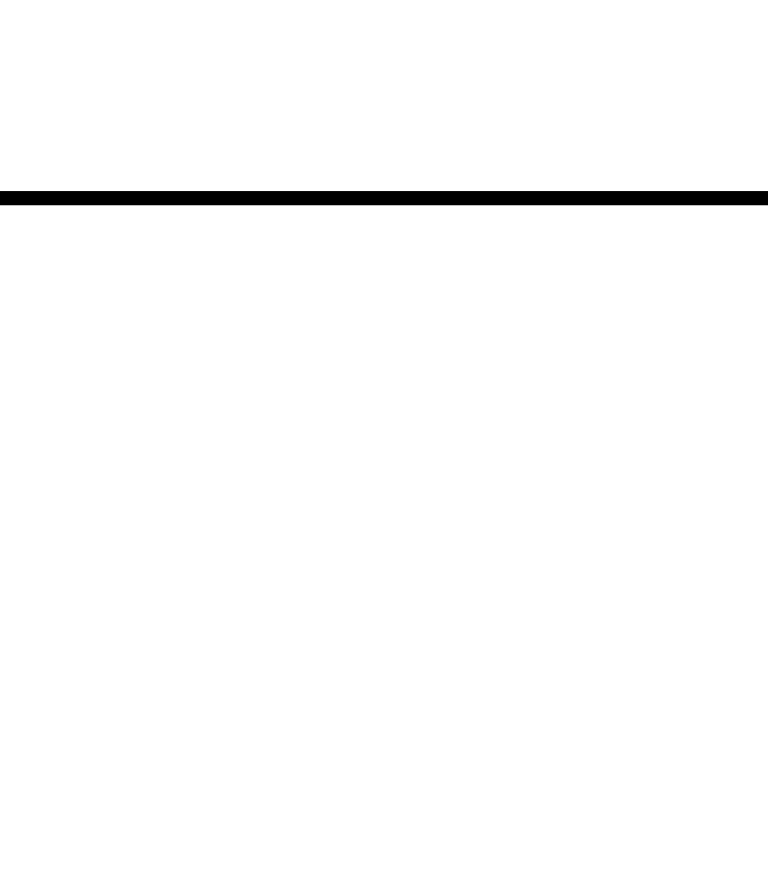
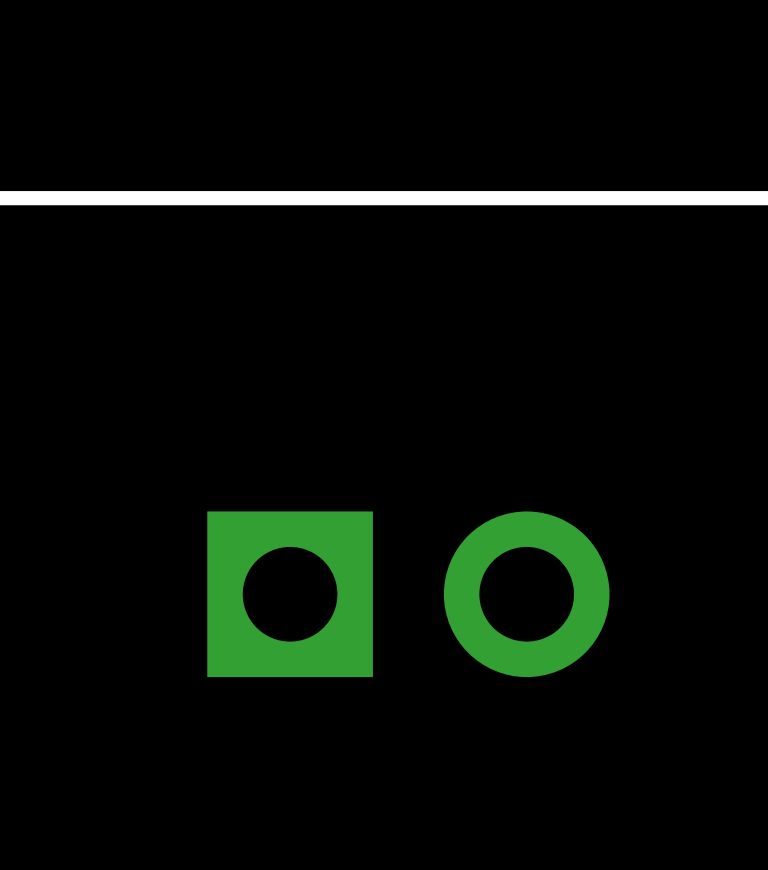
part: none -> (408, 594)

